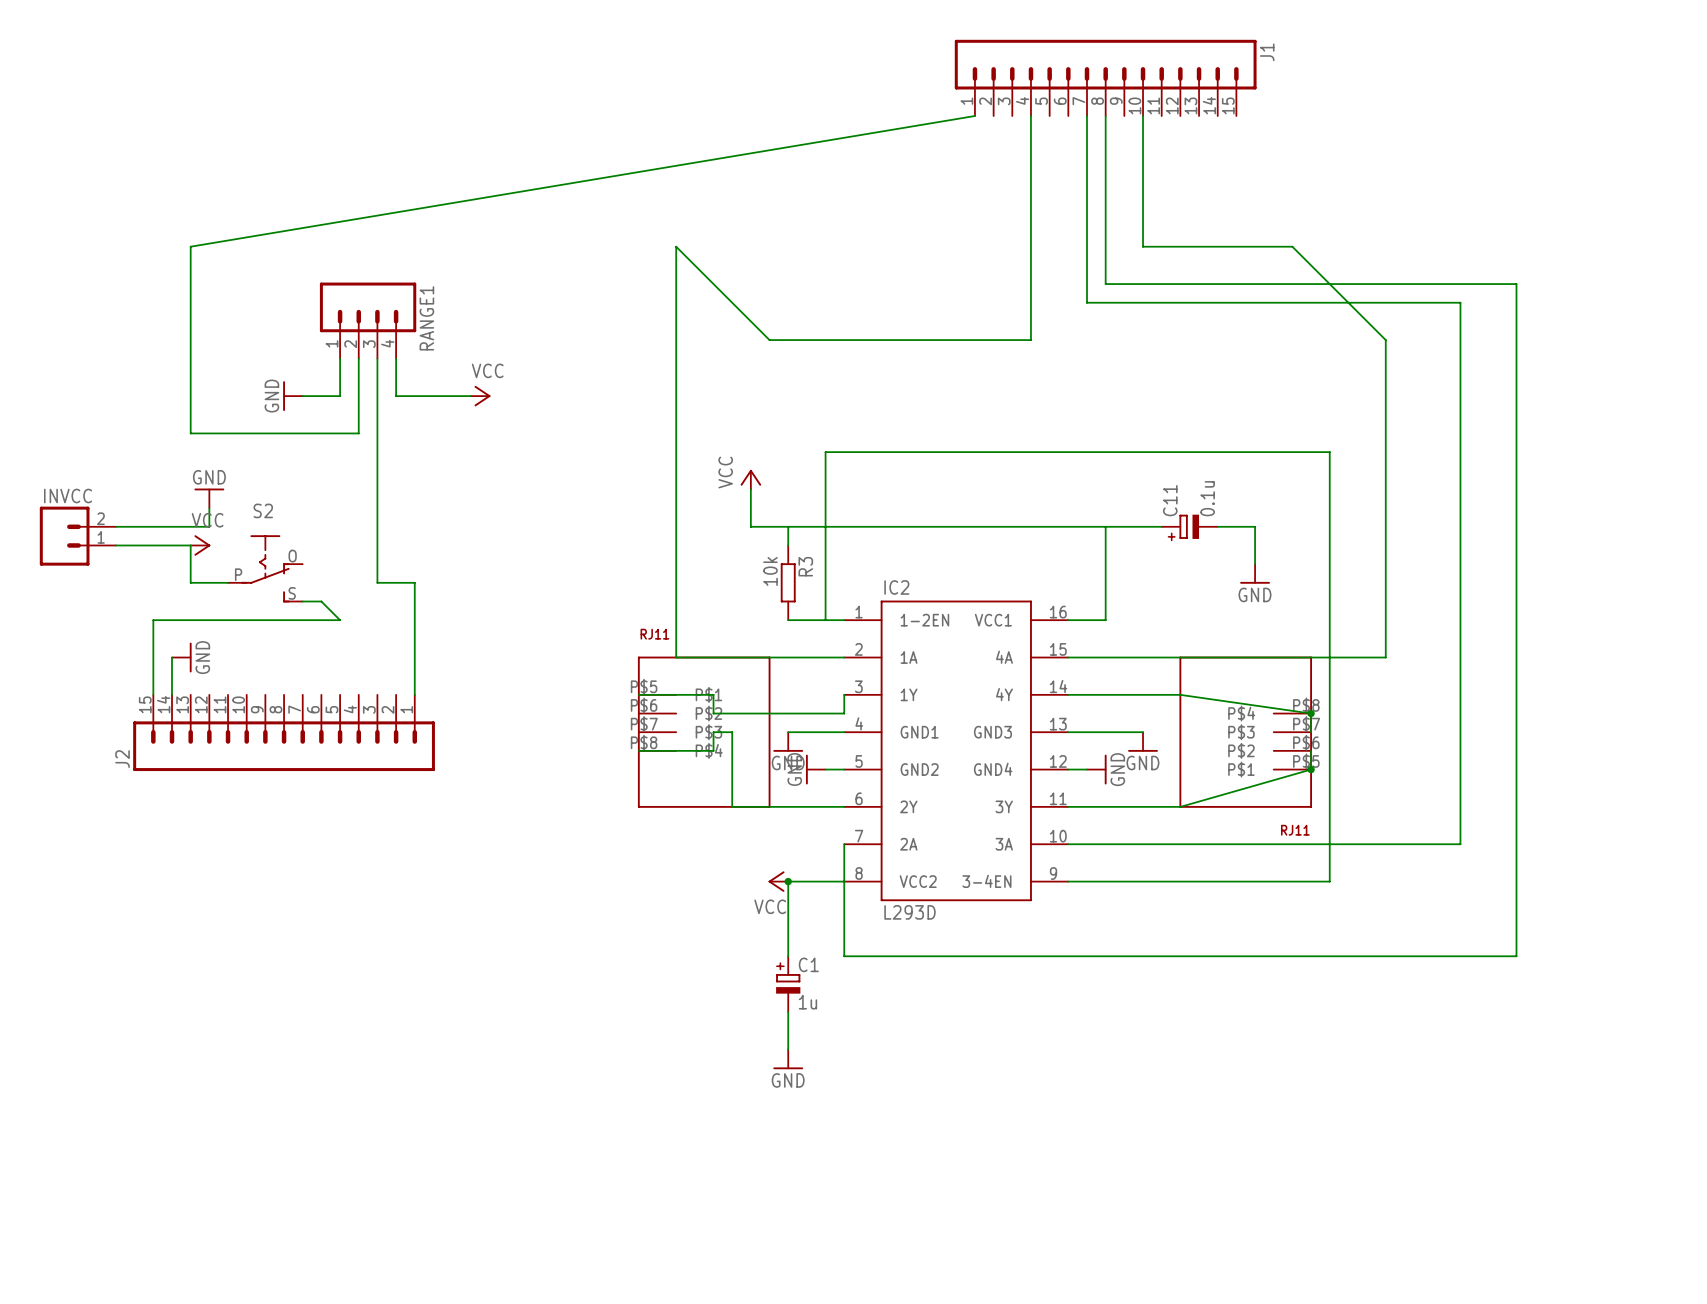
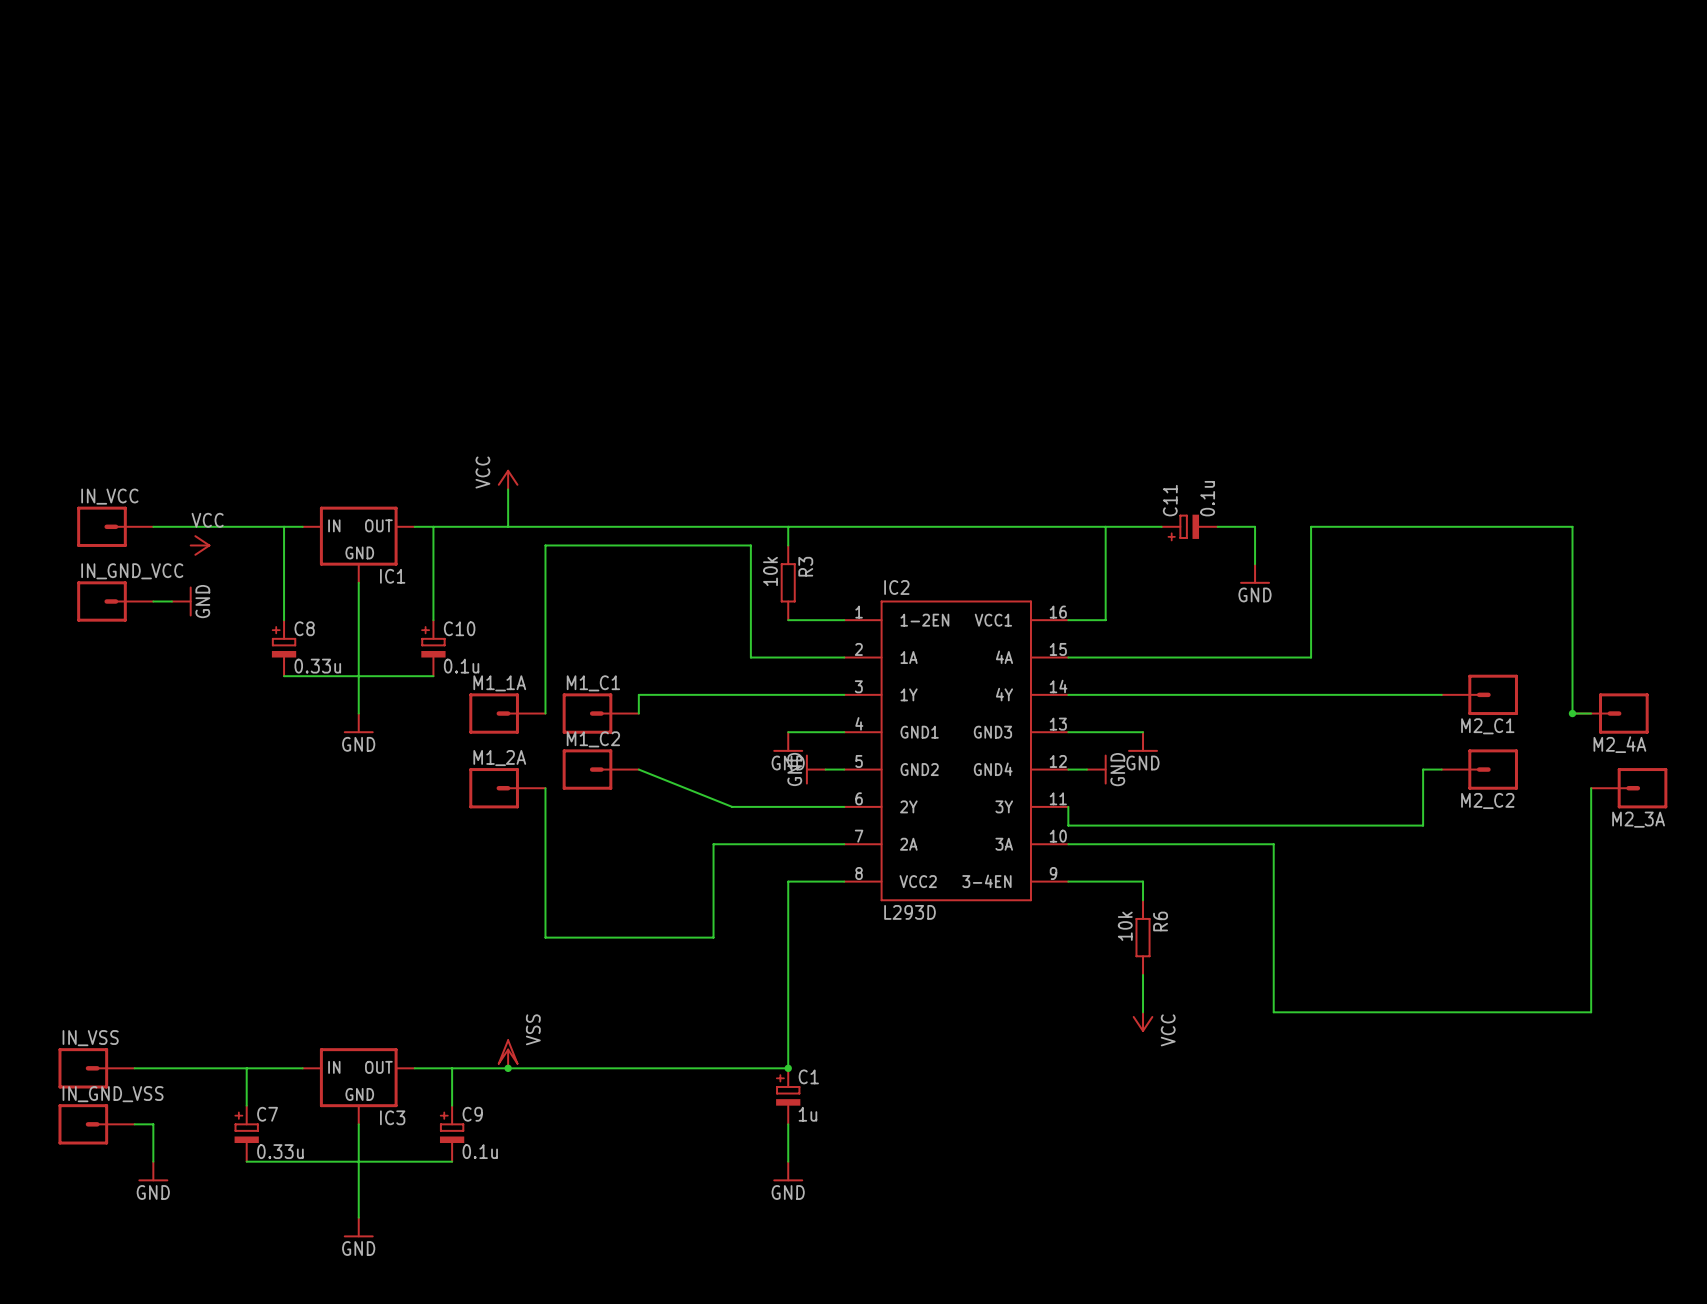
J1: (1105, 77) -> none
wire: (974, 115) (190, 246) (190, 433) (358, 433) (358, 358) -> none
wire: (1030, 115) (1030, 340) (769, 340) (676, 246) (676, 657) (750, 657) -> (545, 713) (545, 545) (750, 545) (750, 657)
wire: (1087, 115) (1087, 302) (1460, 302) (1460, 844) (1273, 844) -> (1591, 788) (1591, 1012) (1273, 1012) (1273, 844)
wire: (1105, 115) (1105, 284) (1516, 284) (1516, 956) (844, 956) (844, 844) -> (545, 788) (545, 937) (713, 937) (713, 844) (844, 844)
wire: (1143, 115) (1143, 246) (1292, 246) (1385, 340) (1385, 657) (1311, 657) -> (1591, 713) (1572, 713) (1572, 526) (1311, 526) (1311, 657)
RANGE1: (368, 320) -> none
wire: (340, 358) (340, 396) (302, 396) -> none
wire: (377, 358) (377, 582) (414, 582) (414, 694) -> none
wire: (396, 358) (396, 396) (470, 396) -> none
power symbol: GND (292, 396) -> none
power symbol position: VCC (480, 396) -> VCC (508, 479)
power symbol rotation: 0° (482, 396) -> 90° counterclockwise (508, 477)
power symbol: VCC (750, 479) -> none
wire: none -> (508, 489) (508, 526)
wire: (750, 489) (750, 526) -> (414, 526) (750, 526)
power symbol: GND (209, 498) -> none
wire: (209, 508) (209, 526) -> (302, 526) (209, 526)
IN_VCC: none -> (115, 526)
wire: none -> (284, 526) (284, 620)
wire: none -> (433, 526) (433, 620)
INVCC: (77, 536) -> none
IC1: none -> (358, 544)
wire: (115, 545) (190, 545) (190, 582) (228, 582) -> none
S2: (265, 568) -> none
wire: none -> (358, 582) (358, 713)
IN_GND_VCC: none -> (115, 601)
wire: none -> (153, 601) (172, 601)
power symbol: none -> GND (181, 601)
wire: (302, 601) (321, 601) (340, 620) (153, 620) (153, 694) -> none
wire: (825, 620) (825, 452) (1329, 452) (1329, 881) (1143, 881) -> (1143, 900) (1143, 881)
C8: none -> 0.33u (284, 648)
C10: none -> 0.1u (433, 648)
wire: (172, 657) (172, 694) -> none
power symbol: GND (181, 657) -> none
wire: none -> (284, 676) (433, 676)
wire: (713, 694) (713, 713) (844, 713) (844, 694) -> (713, 694) (844, 694)
wire: (1180, 694) (1311, 713) (1311, 732) -> (1180, 694) (1441, 694)
M2_C1: none -> (1479, 694)
M1_1A: none -> (507, 713)
M1_C1: none -> (600, 713)
junction: (1311, 713) -> none
junction: none -> (1572, 713)
M2_4A: none -> (1610, 713)
power symbol: none -> GND (358, 723)
J2: (284, 732) -> none
part: (704, 732) -> none
part: (1245, 732) -> none
wire: (638, 750) (713, 750) (713, 732) (732, 732) (732, 806) -> (638, 769) (732, 806)
wire: (1311, 750) (1311, 769) (1180, 806) (1068, 806) -> (1441, 769) (1423, 769) (1423, 825) (1068, 825) (1068, 806)
M1_C2: none -> (600, 769)
junction: (1311, 769) -> none
M2_C2: none -> (1479, 769)
M1_2A: none -> (507, 788)
M2_3A: none -> (1629, 788)
power symbol: VCC (778, 881) -> none
junction: (788, 881) -> none
R6: none -> 10k (1143, 937)
wire: none -> (1143, 974) (1143, 1012)
C1 position: (788, 984) -> (788, 1096)
power symbol: none -> VCC (1143, 1022)
wire: none -> (788, 1049) (788, 1068) (414, 1068)
power symbol: none -> VSS (508, 1053)
power symbol position: GND (788, 1059) -> GND (788, 1171)
IN_VSS: none -> (96, 1068)
wire: none -> (134, 1068) (302, 1068)
wire: none -> (246, 1068) (246, 1105)
wire: none -> (452, 1068) (452, 1105)
junction: none -> (508, 1068)
junction: none -> (788, 1068)
IC3: none -> (358, 1086)
IN_GND_VSS: none -> (96, 1124)
wire: none -> (134, 1124) (153, 1124) (153, 1161)
wire: none -> (358, 1124) (358, 1217)
wire: none -> (788, 1124) (788, 1161)
C7: none -> 0.33u (246, 1133)
C9: none -> 0.1u (452, 1133)
wire: none -> (246, 1161) (452, 1161)
power symbol: none -> GND (153, 1171)
power symbol: none -> GND (358, 1227)

